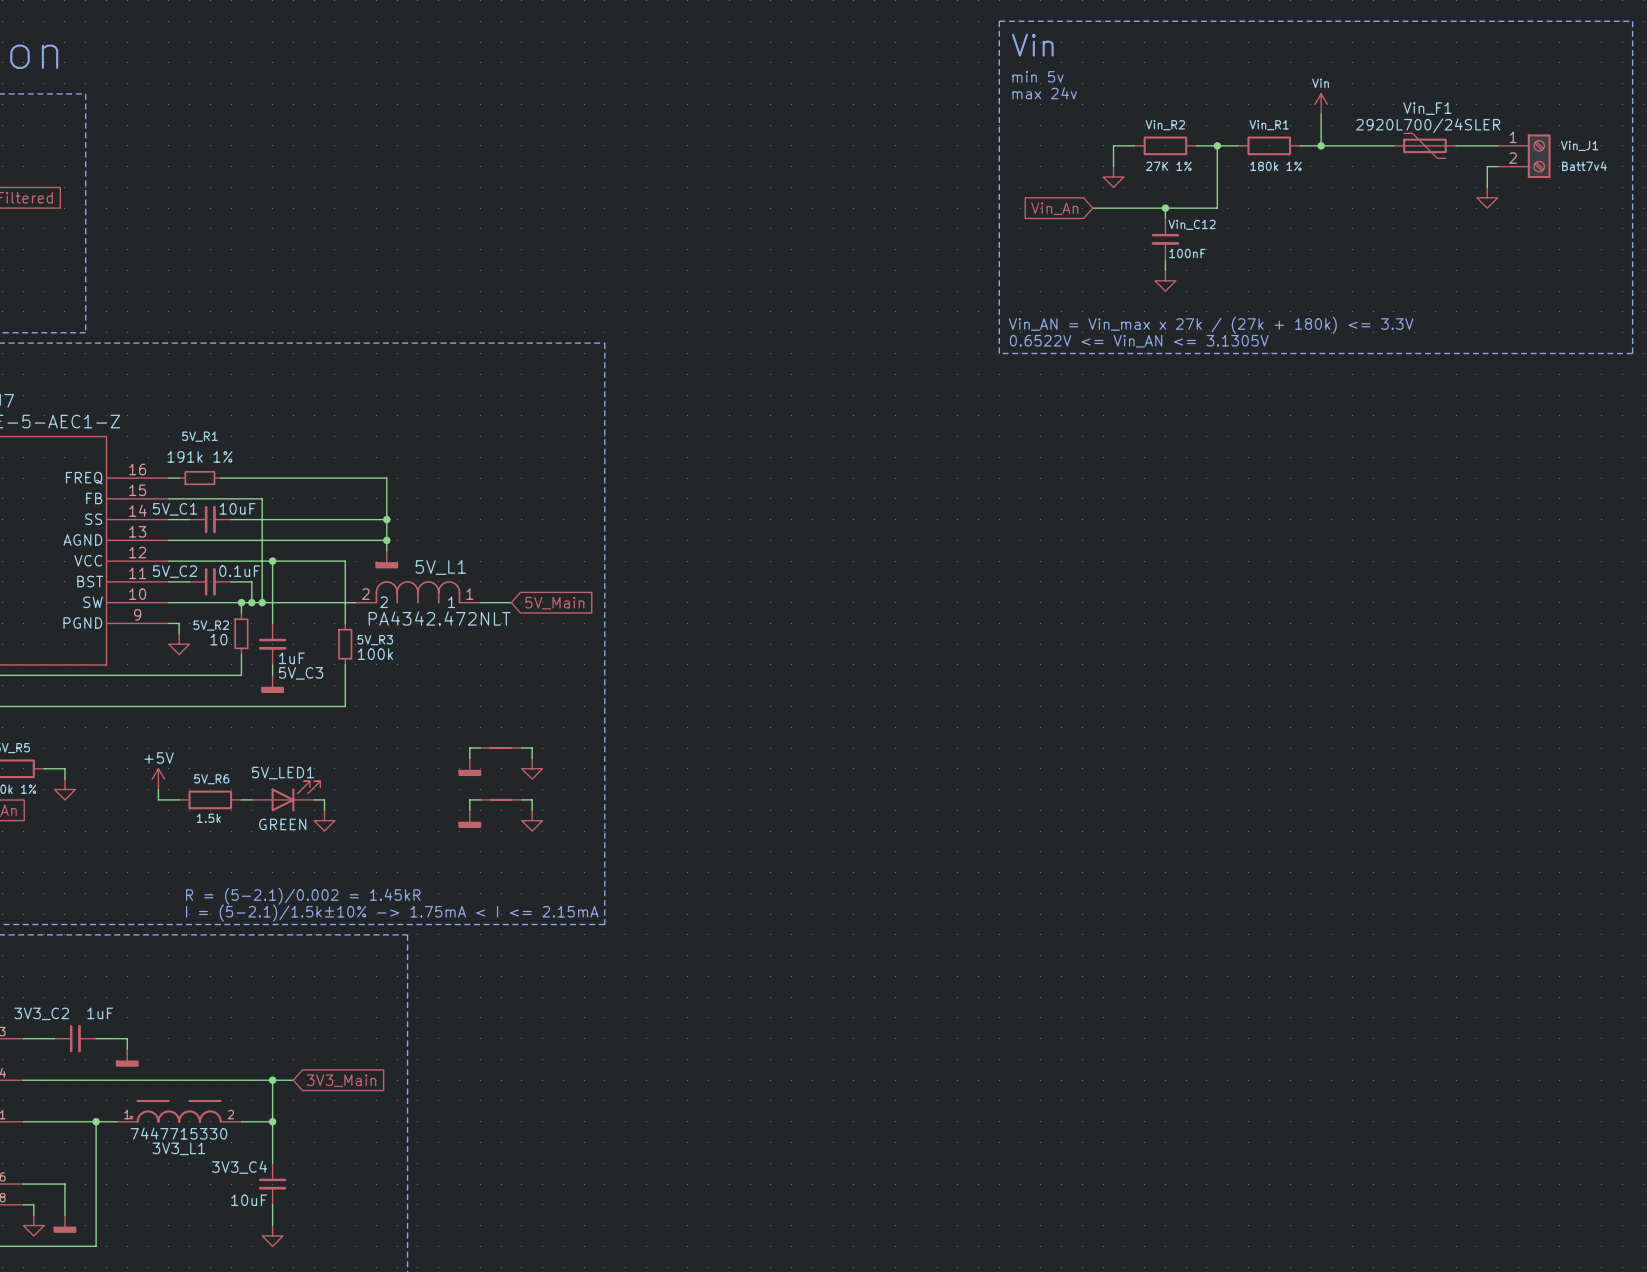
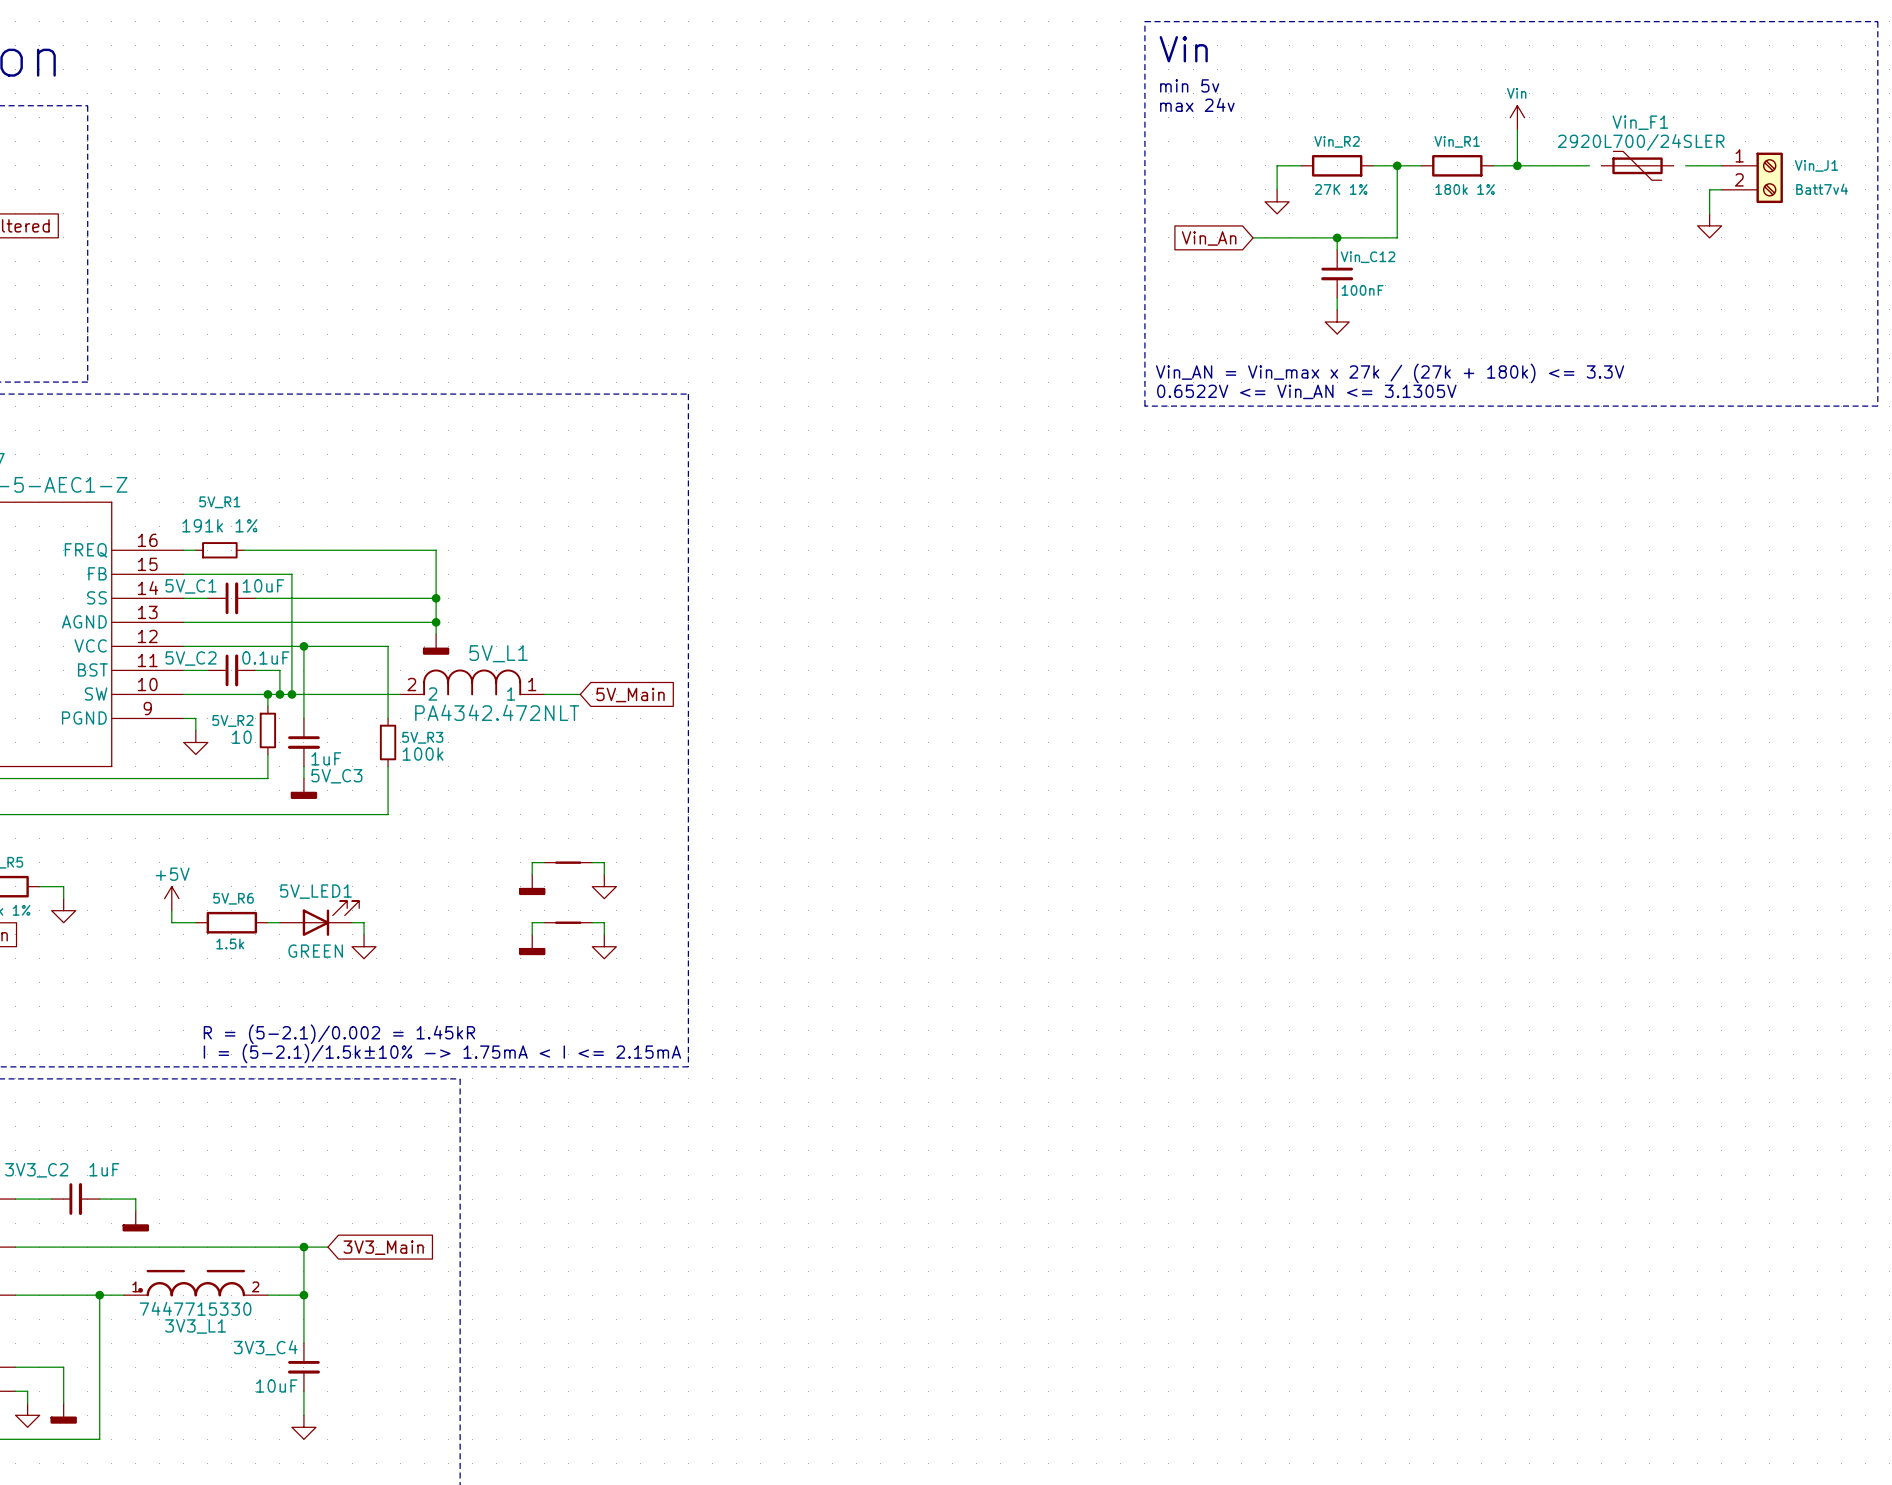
wire: (1383, 145) (1393, 145) -> none
wire: (1456, 145) (1466, 145) -> none

